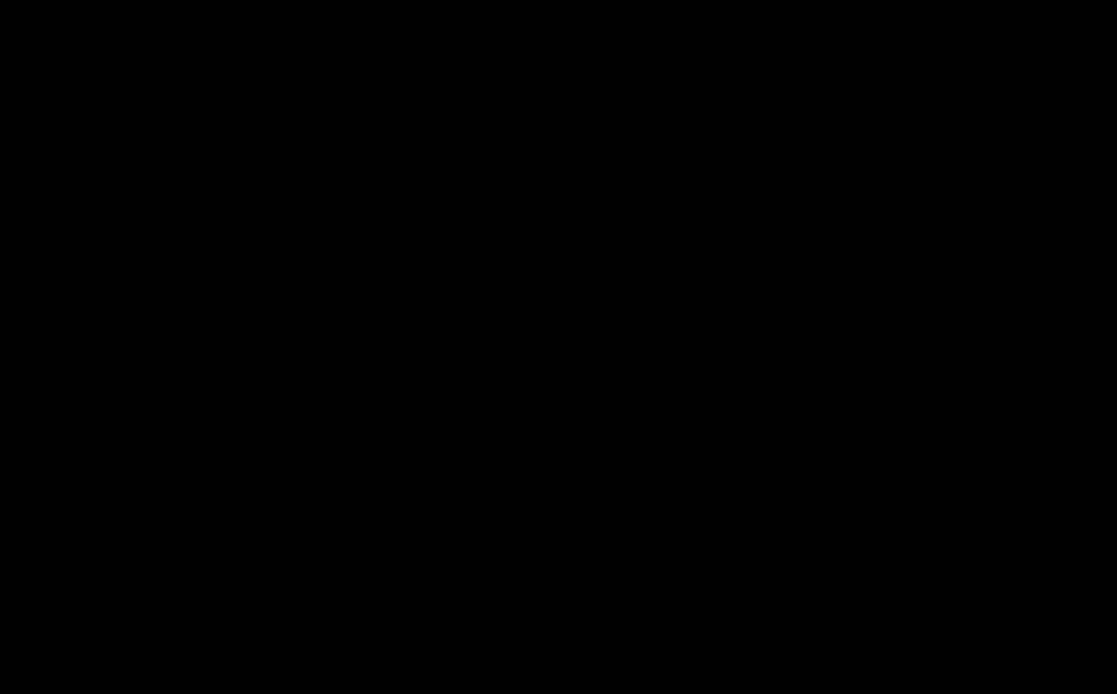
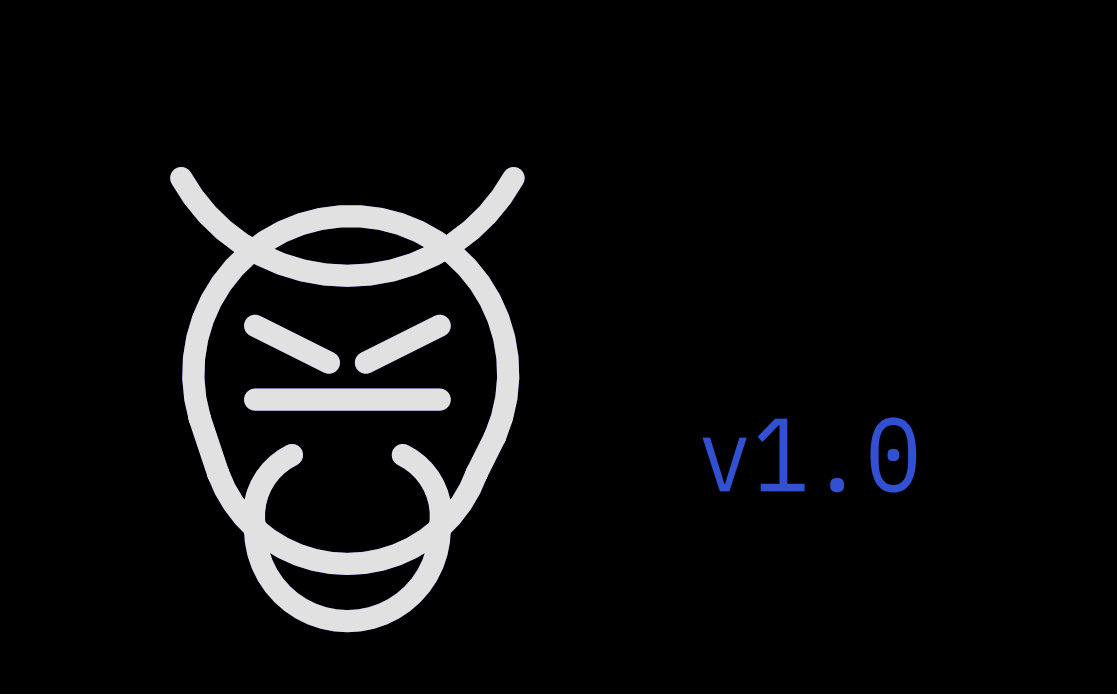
drawing: none -> [170, 166, 525, 633]
text: none -> v1.0 (809, 455)

